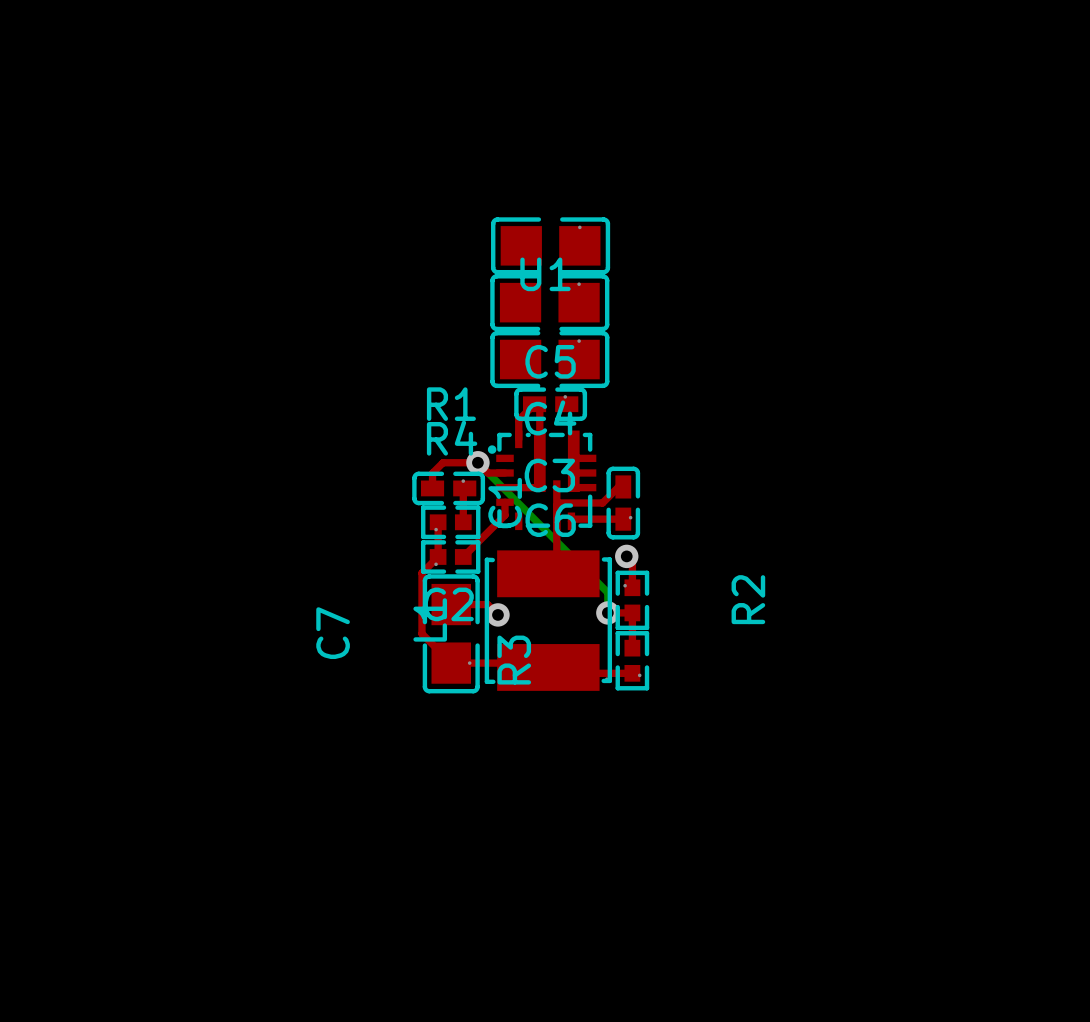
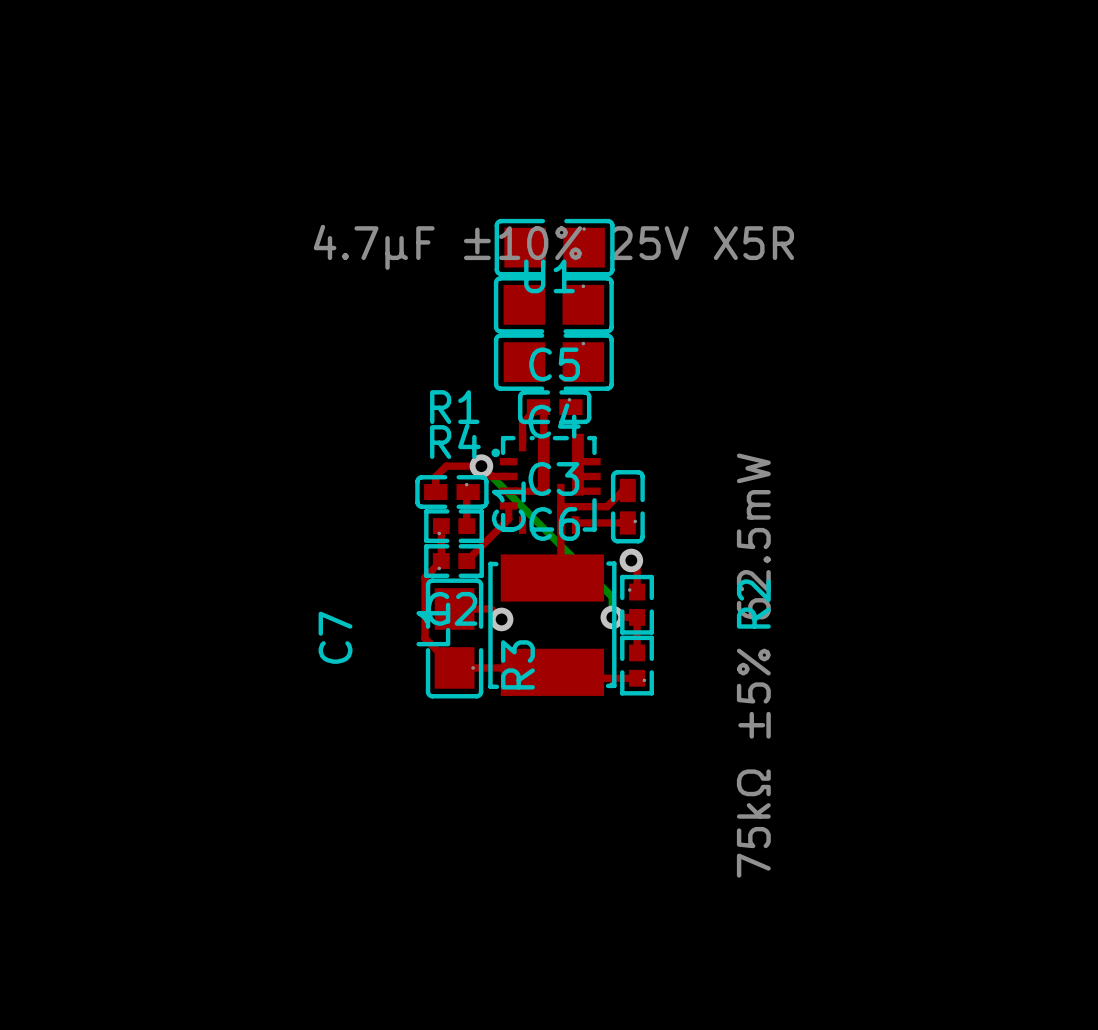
C3 value: none -> 4.7µF ±10% 25V X5R (553, 247)
R3 value: none -> 75kΩ ±5% 62.5mW (753, 665)

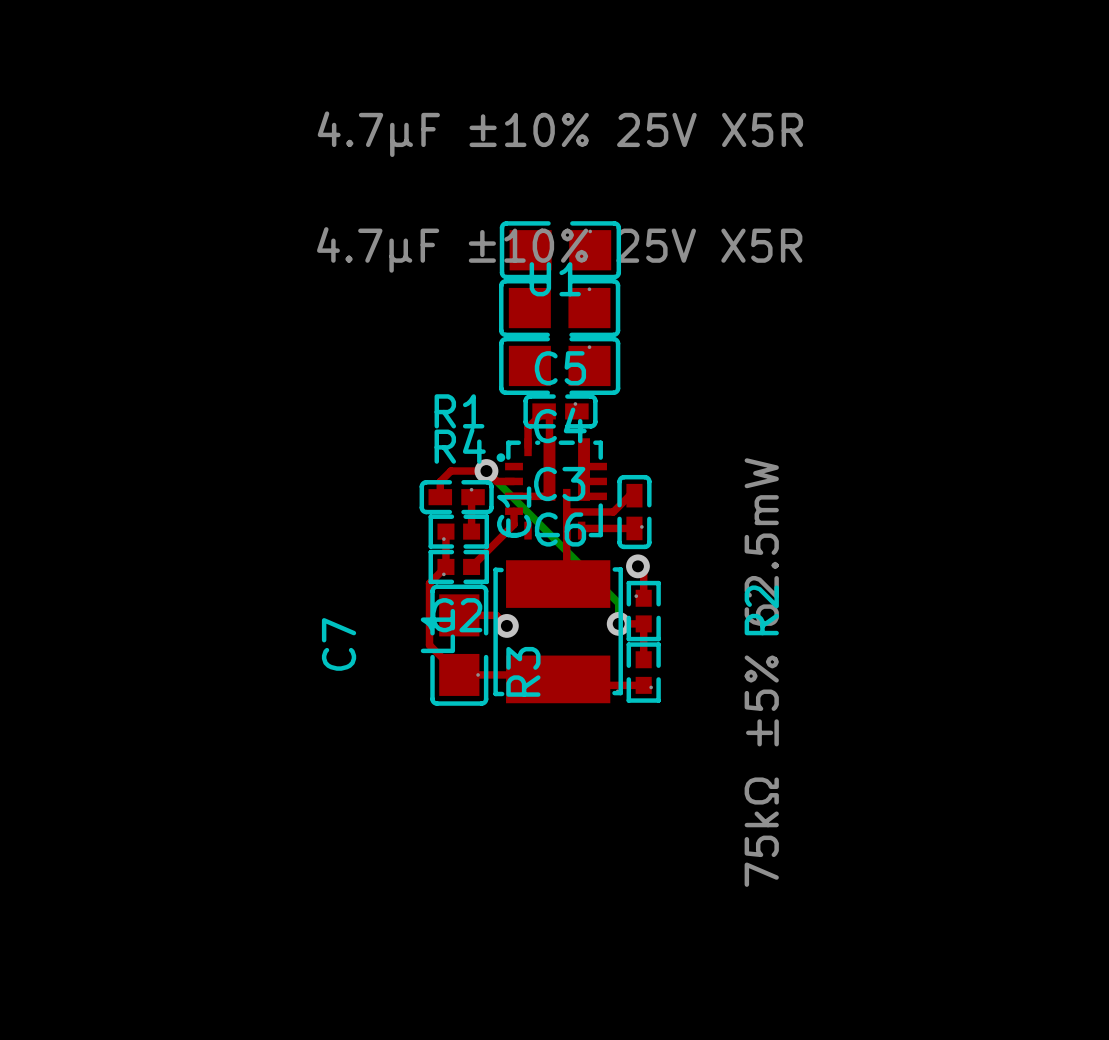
C5 value: none -> 4.7µF ±10% 25V X5R (560, 134)

